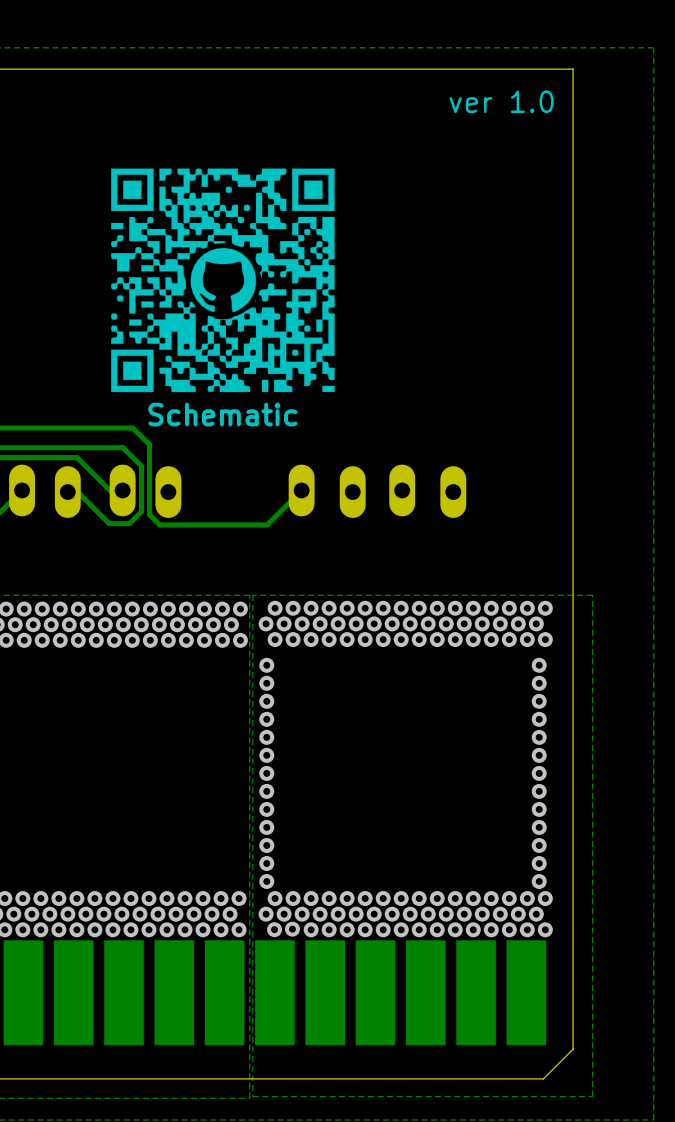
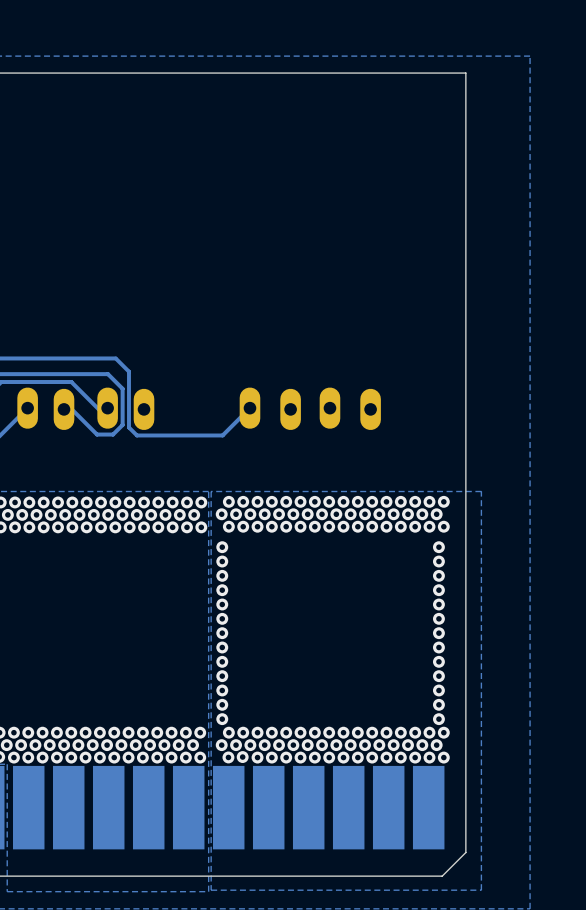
text: ver 1.0 (501, 101) -> none
drawing: [111, 168, 335, 393] -> none
text: Schematic (222, 414) -> none

